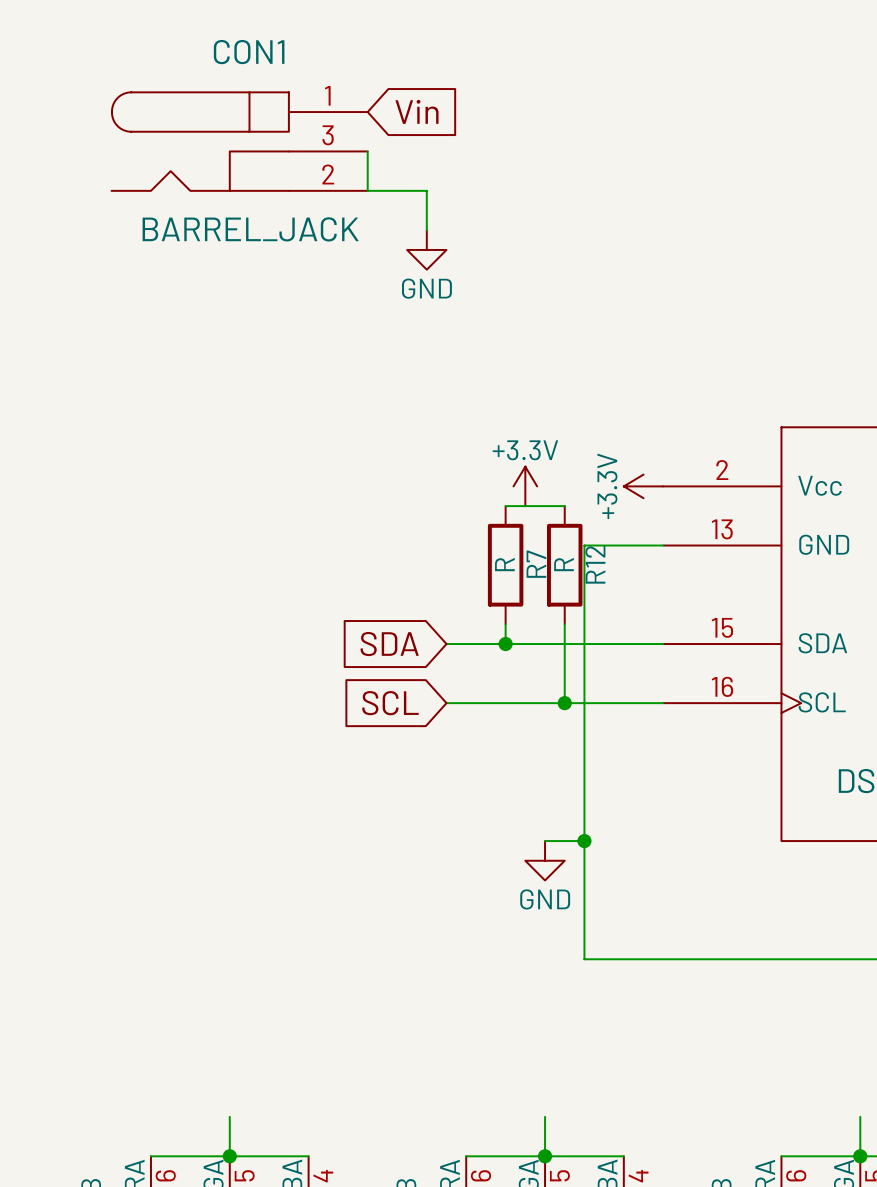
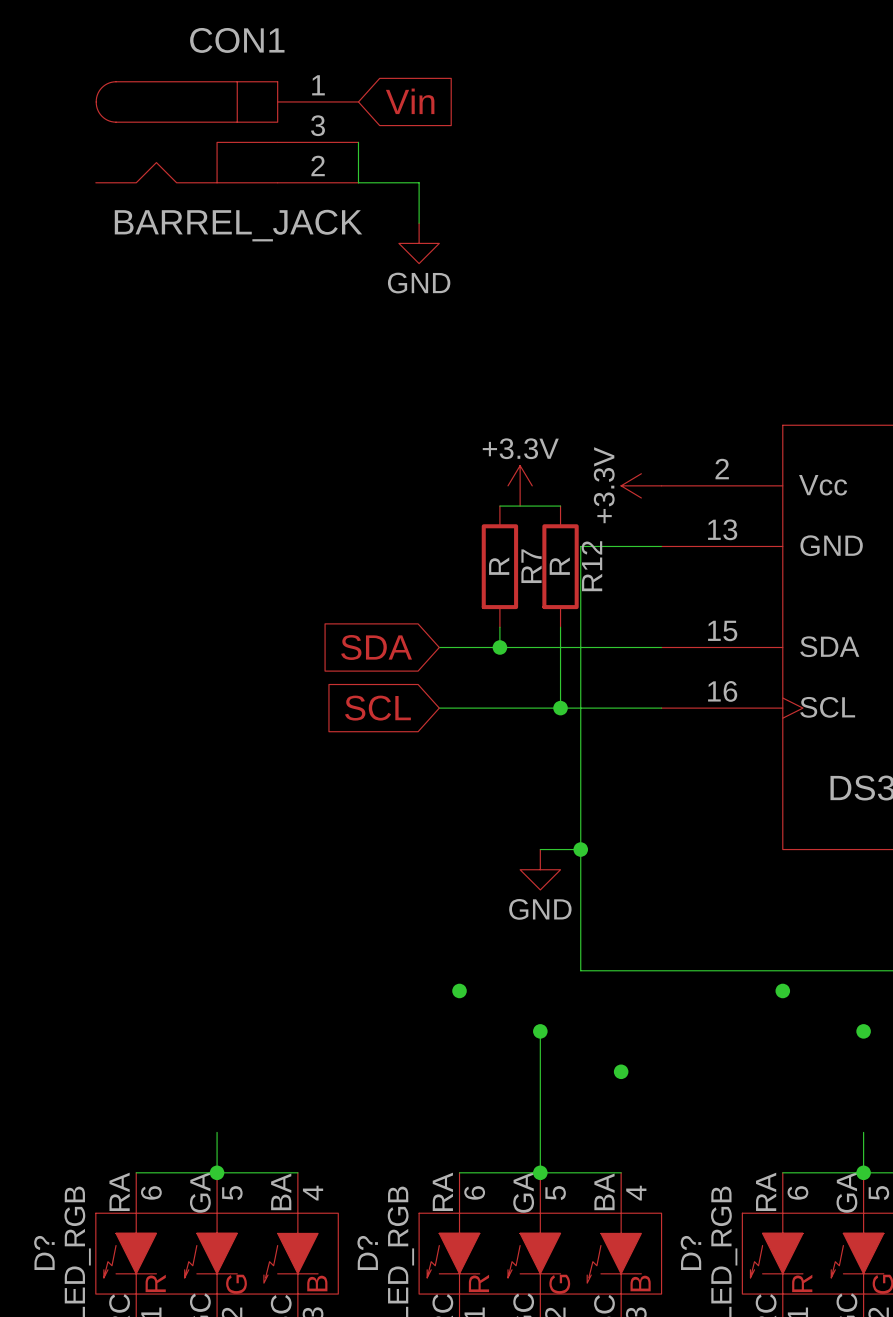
junction: none -> (459, 990)
junction: none -> (782, 990)
wire: none -> (540, 1031) (540, 1132)
junction: none -> (540, 1031)
junction: none -> (863, 1031)
junction: none -> (621, 1071)

